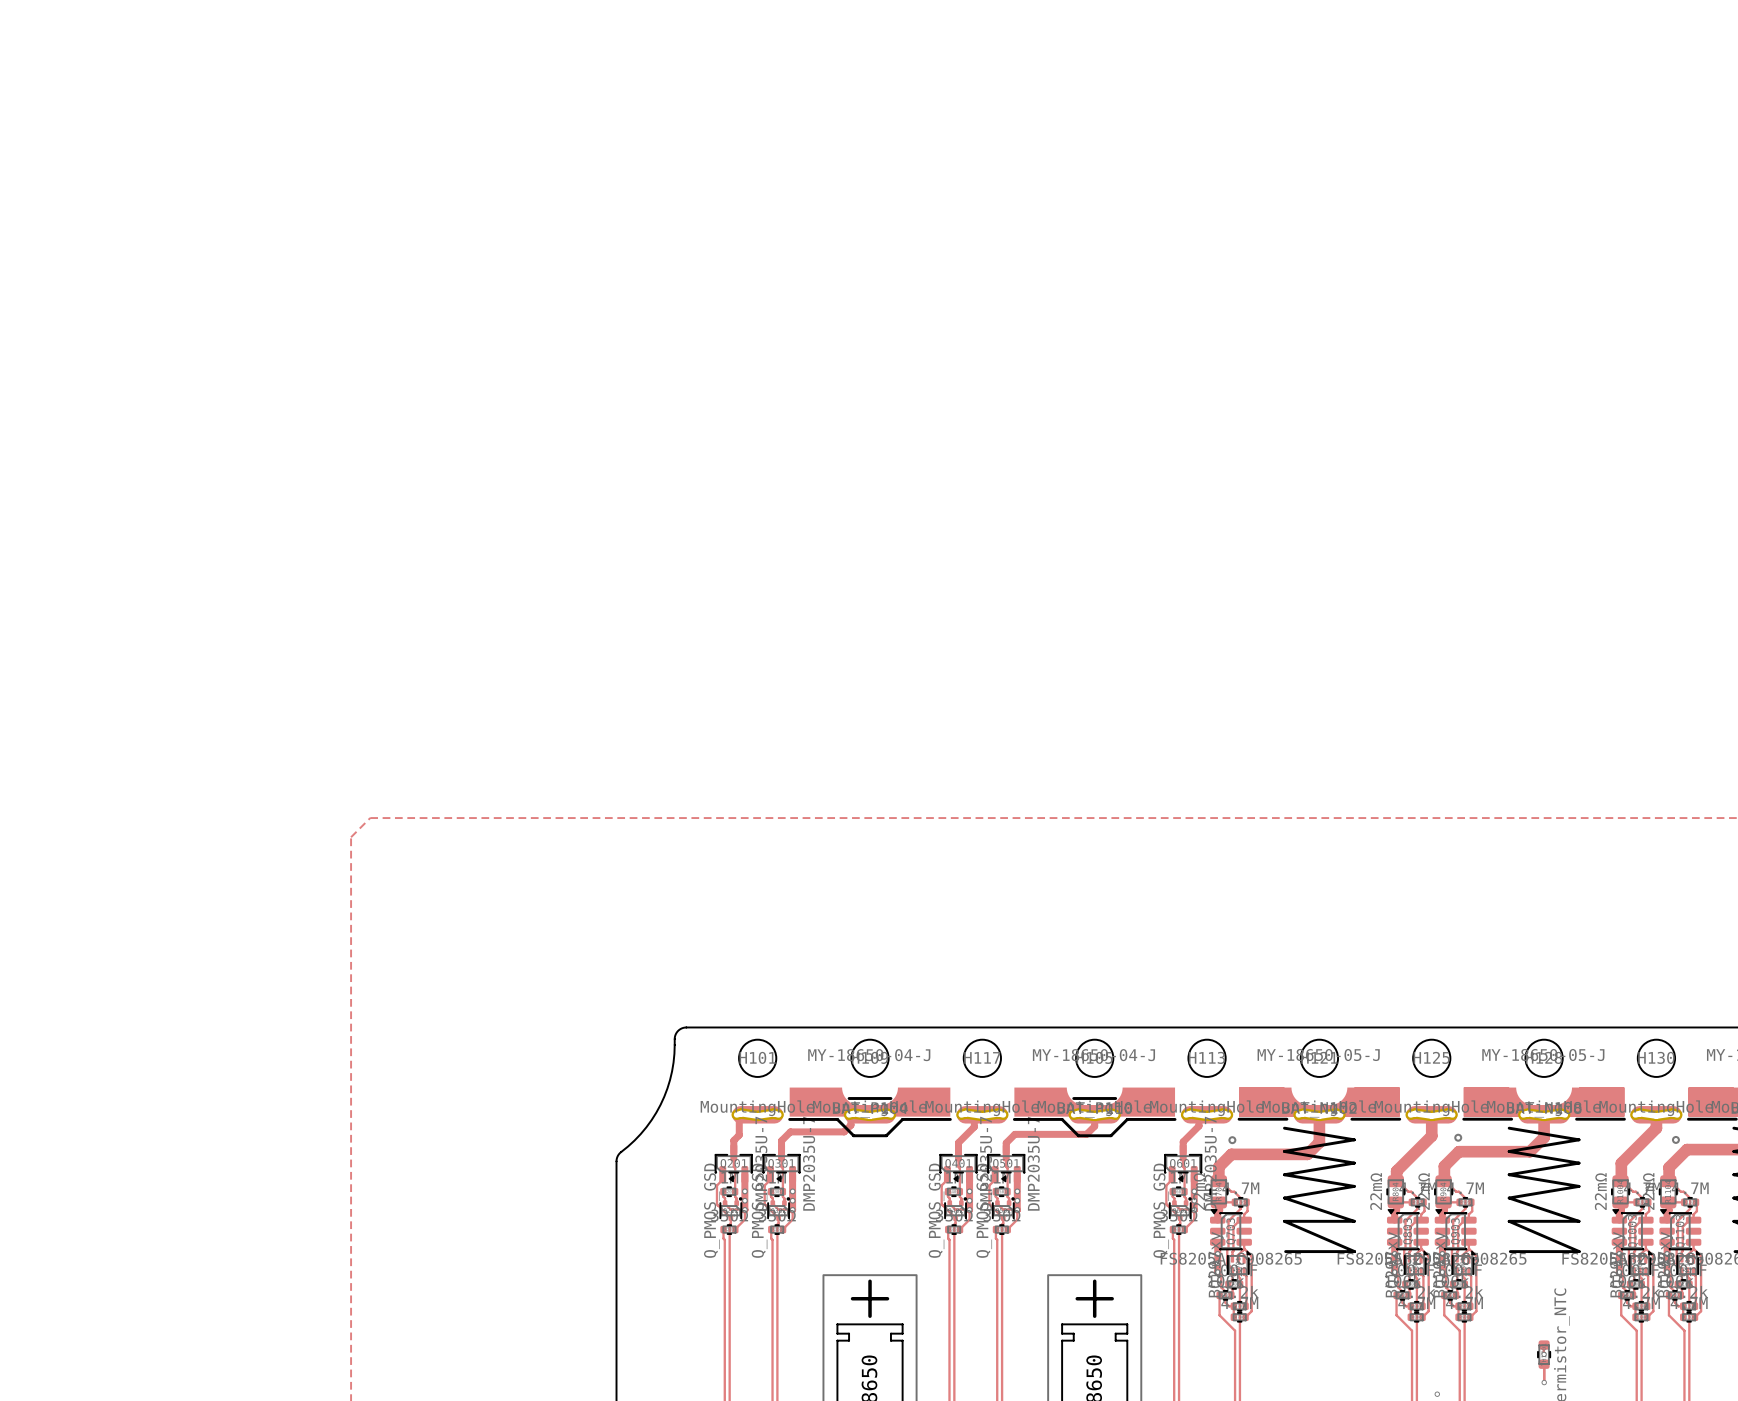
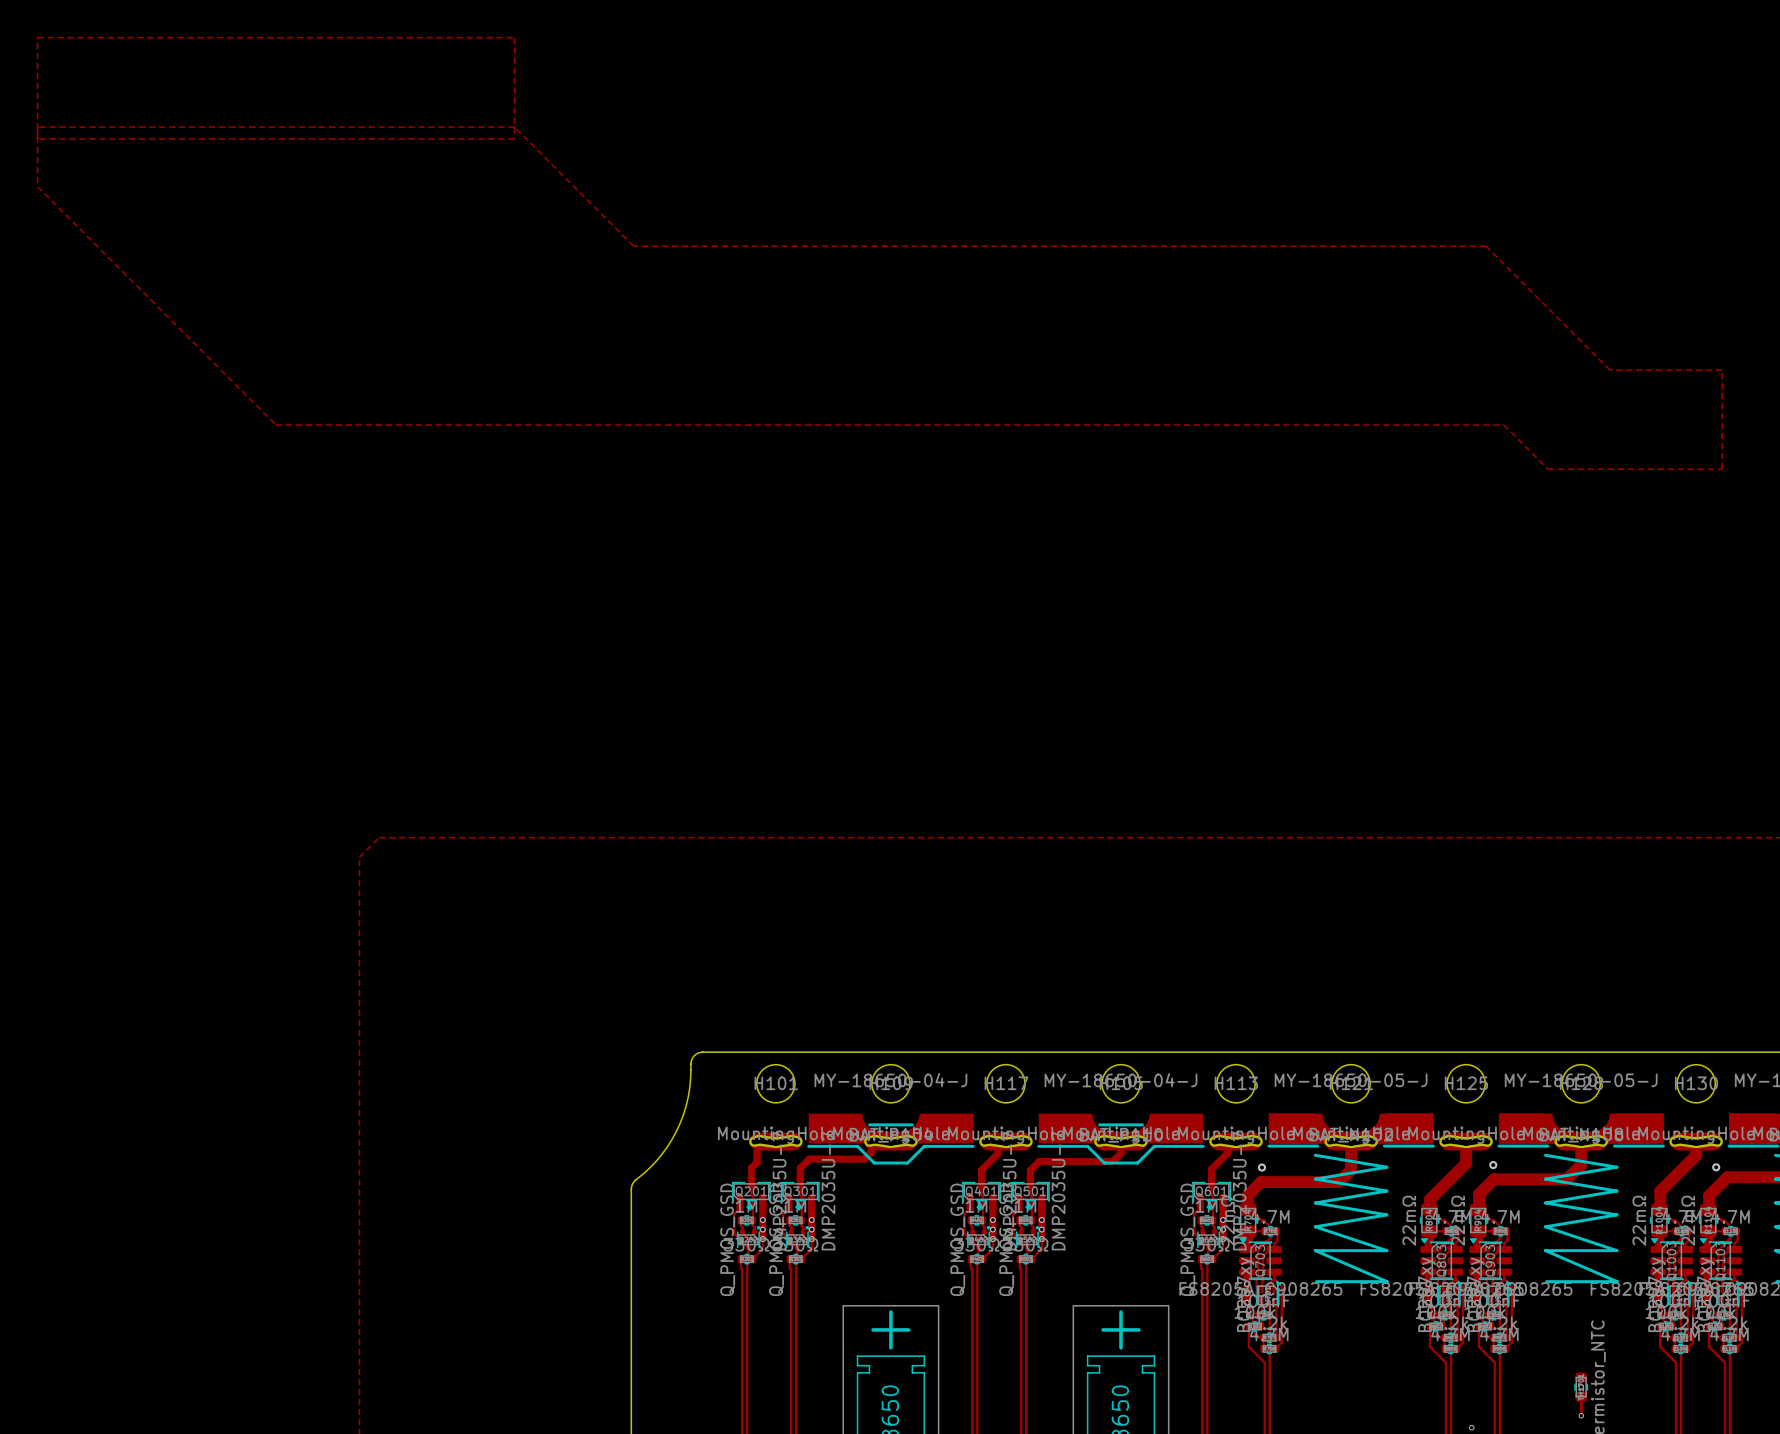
zone outline: none -> (37, 127) (514, 127) (633, 246) (1486, 246) (1610, 370) (1722, 370) (1722, 469) (1548, 469) (1503, 425) (276, 425) (37, 186) (37, 37) (514, 37) (514, 138) (37, 138)

